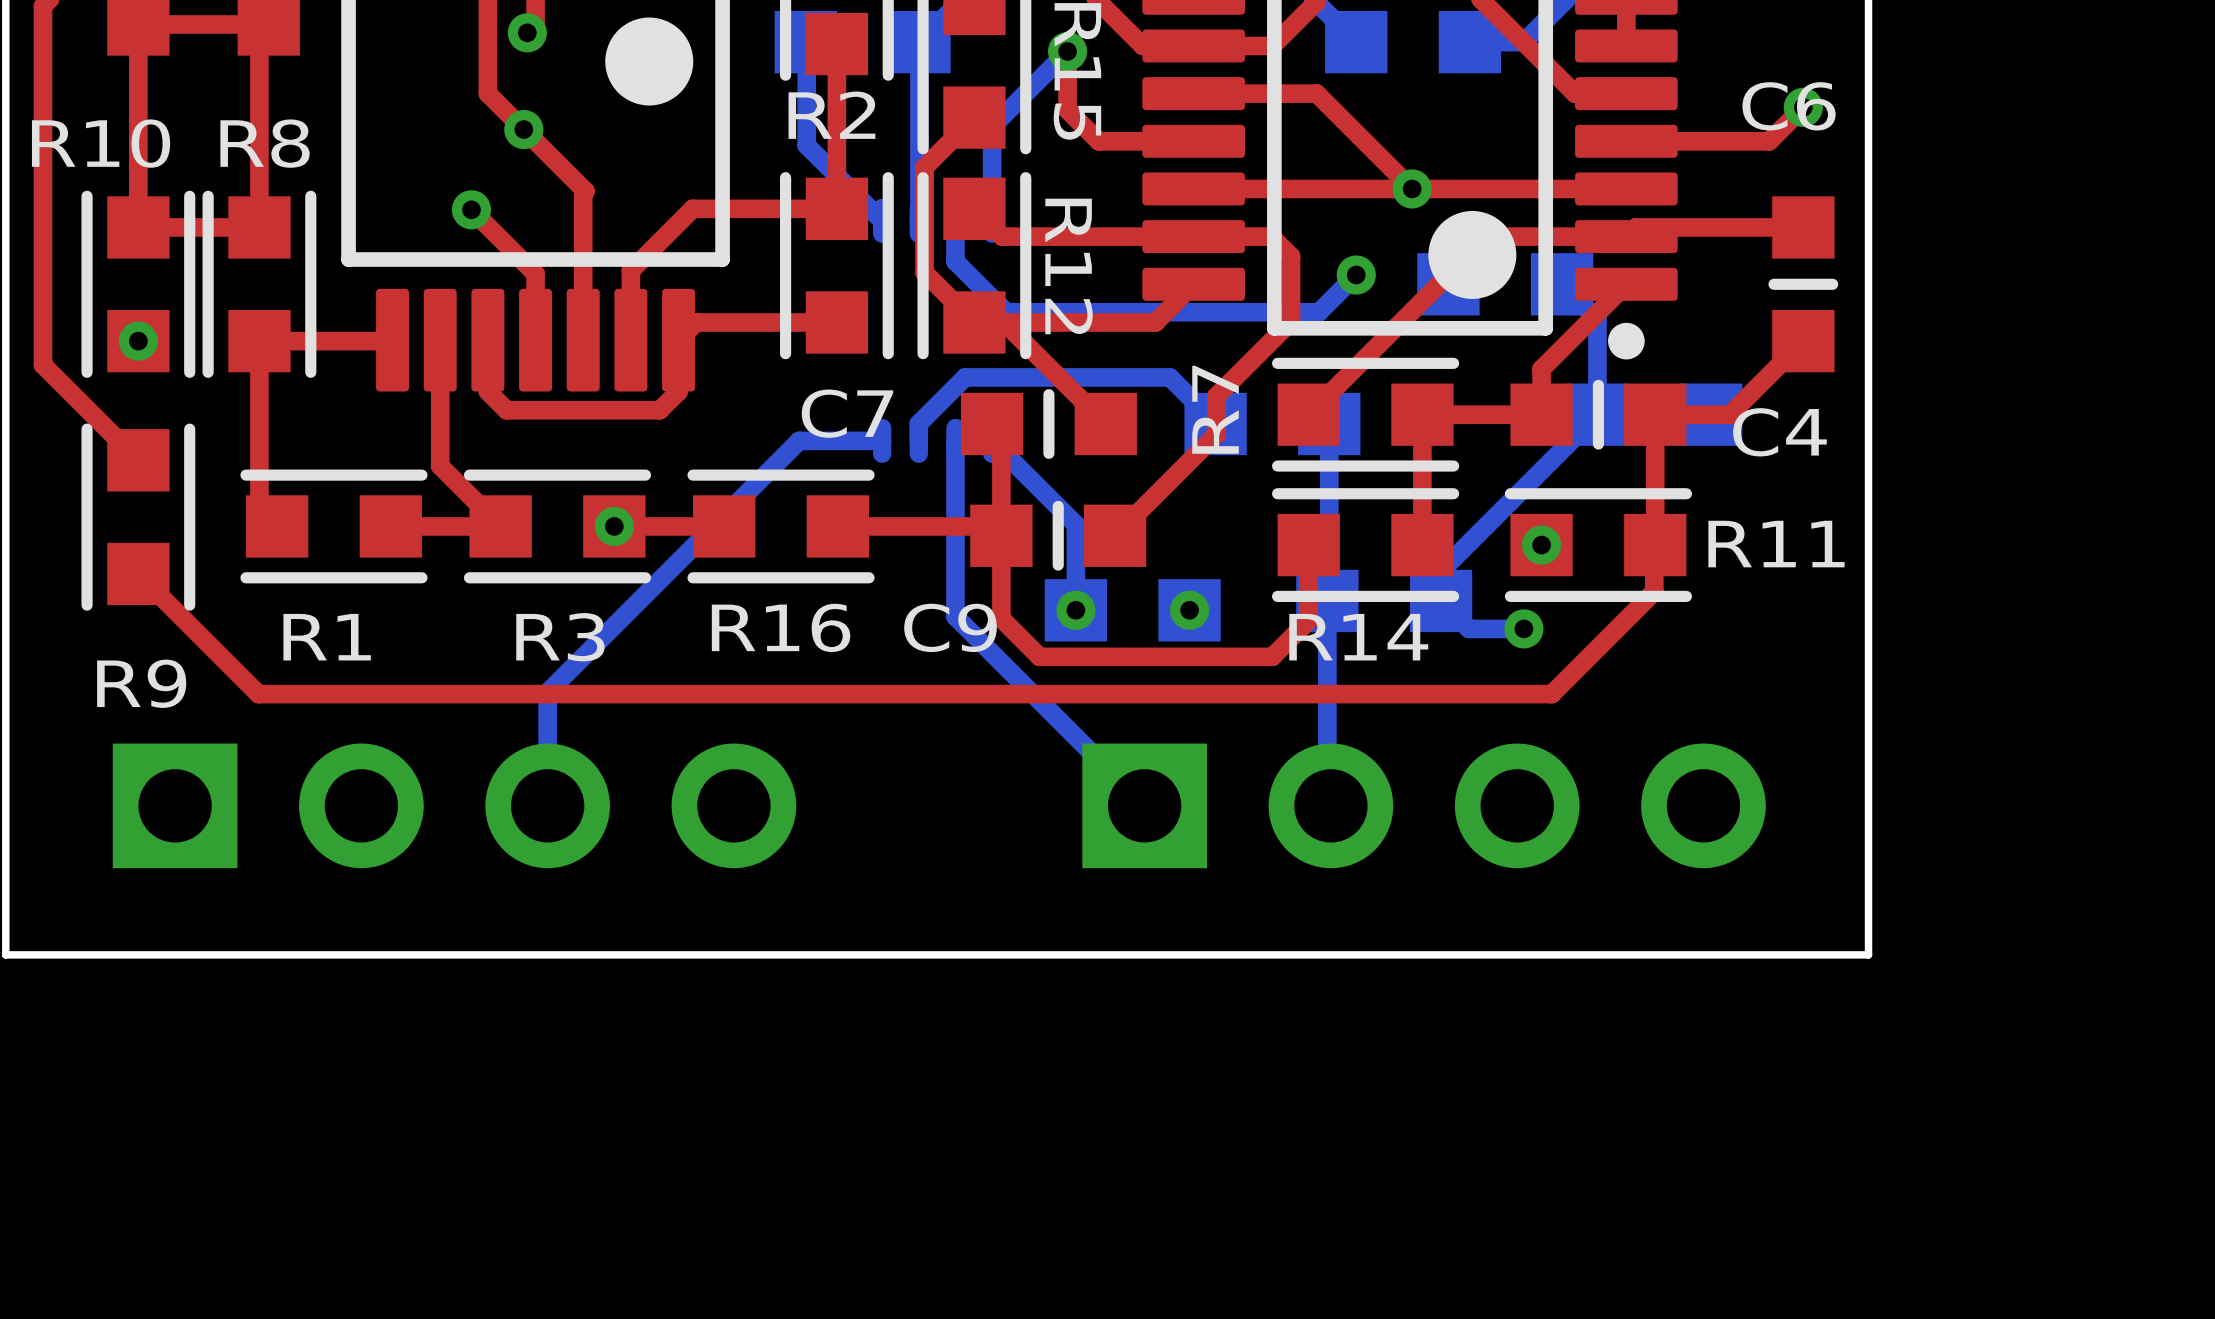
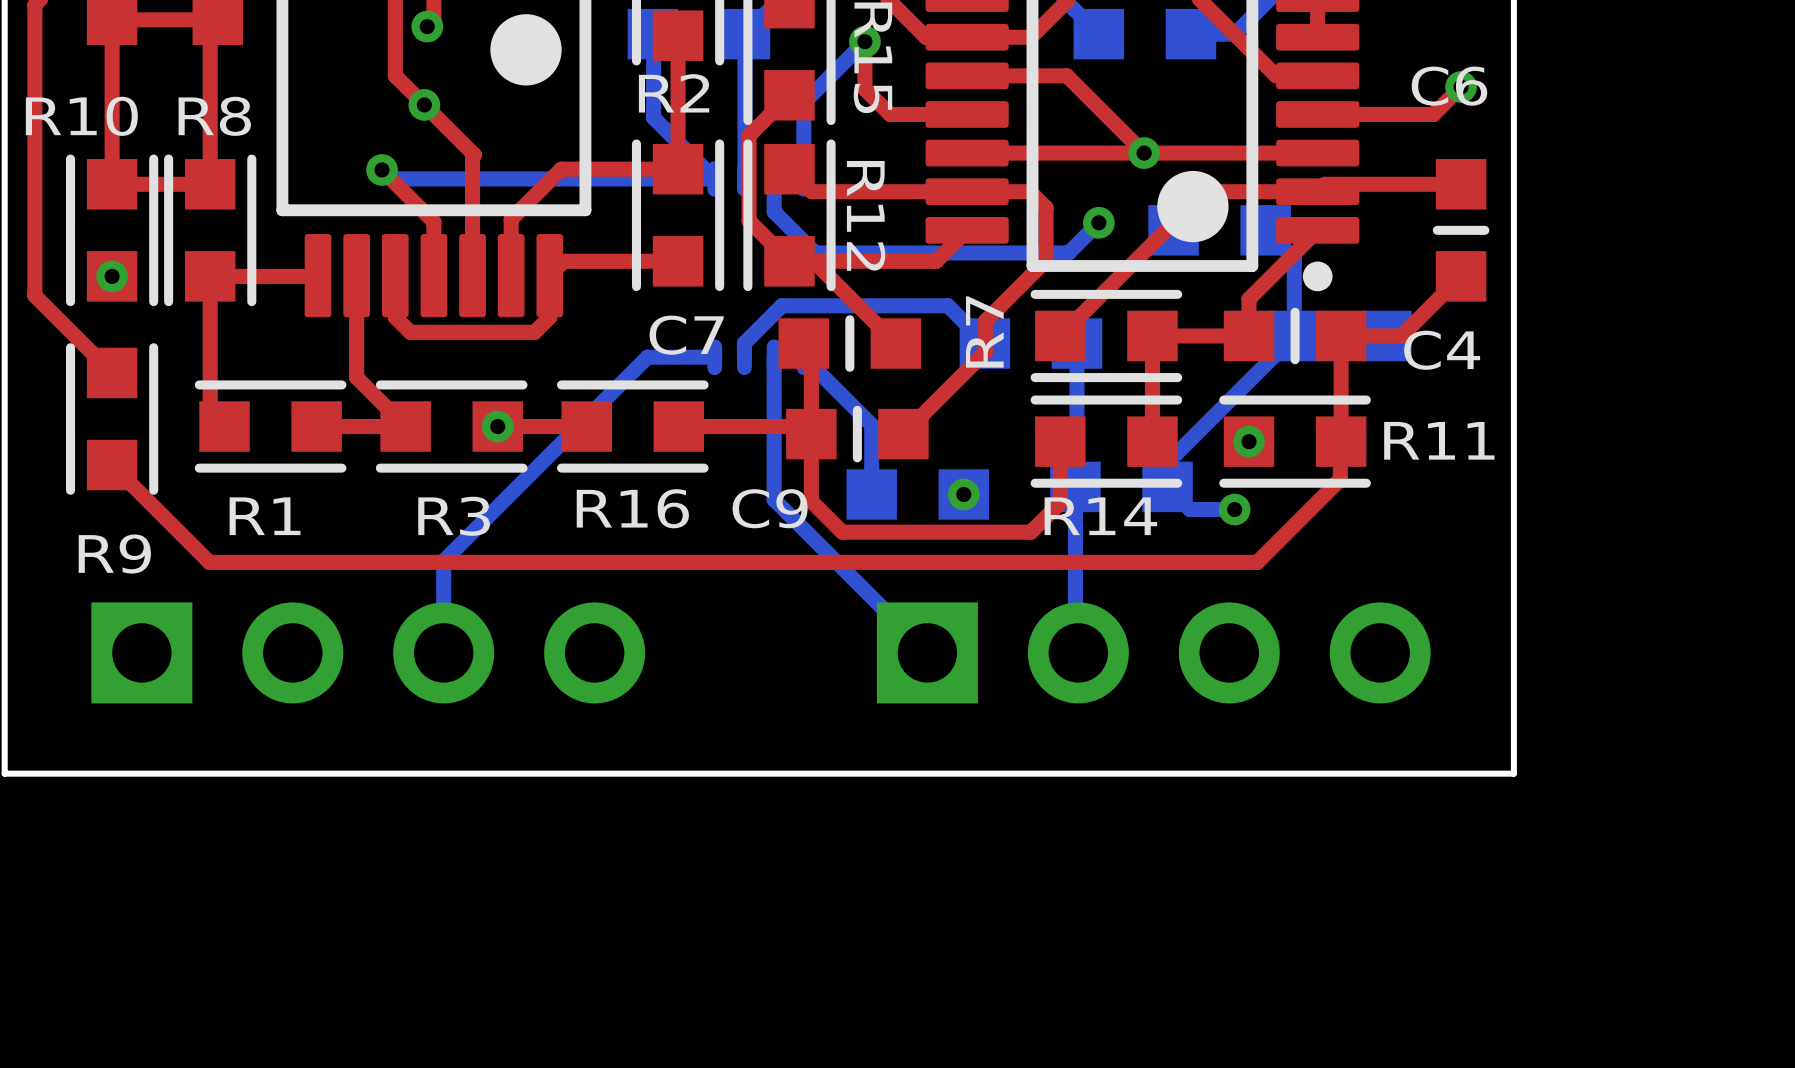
bottom track: none -> (381, 169) (390, 178) (714, 178)
via: (1075, 610) -> none

